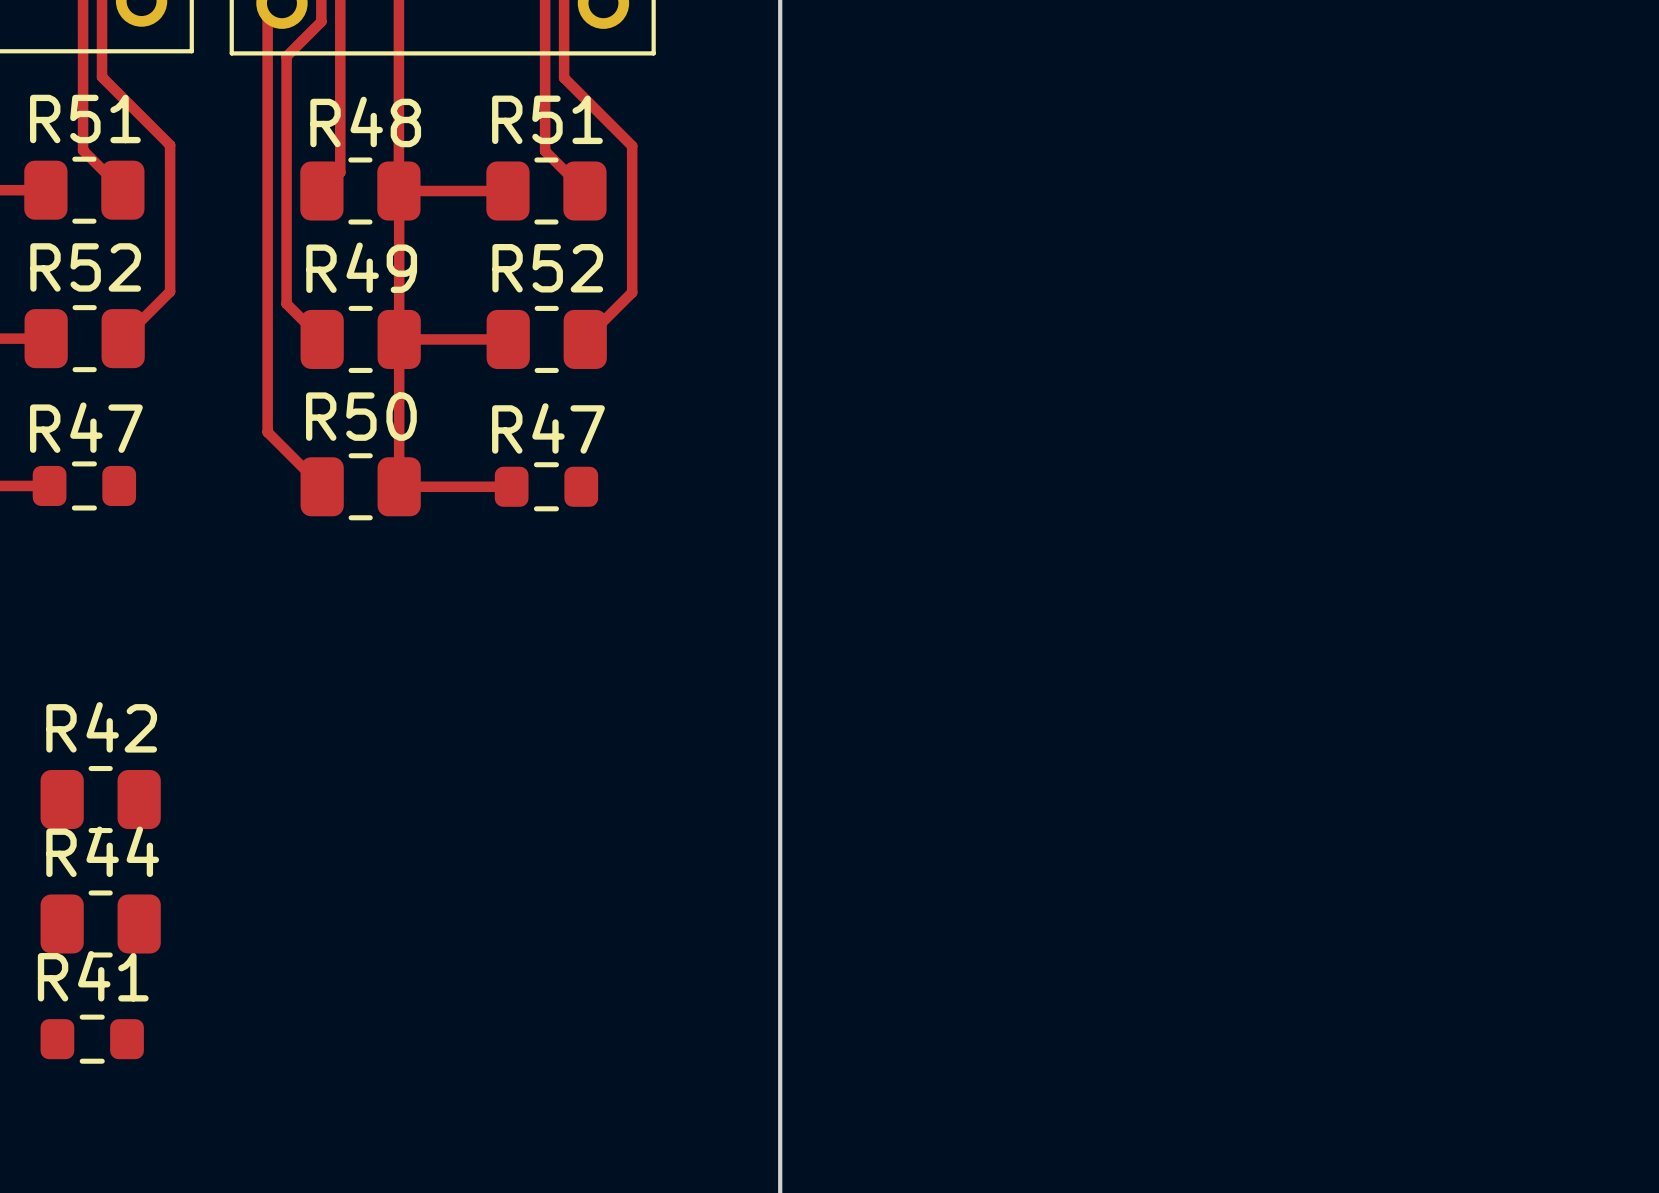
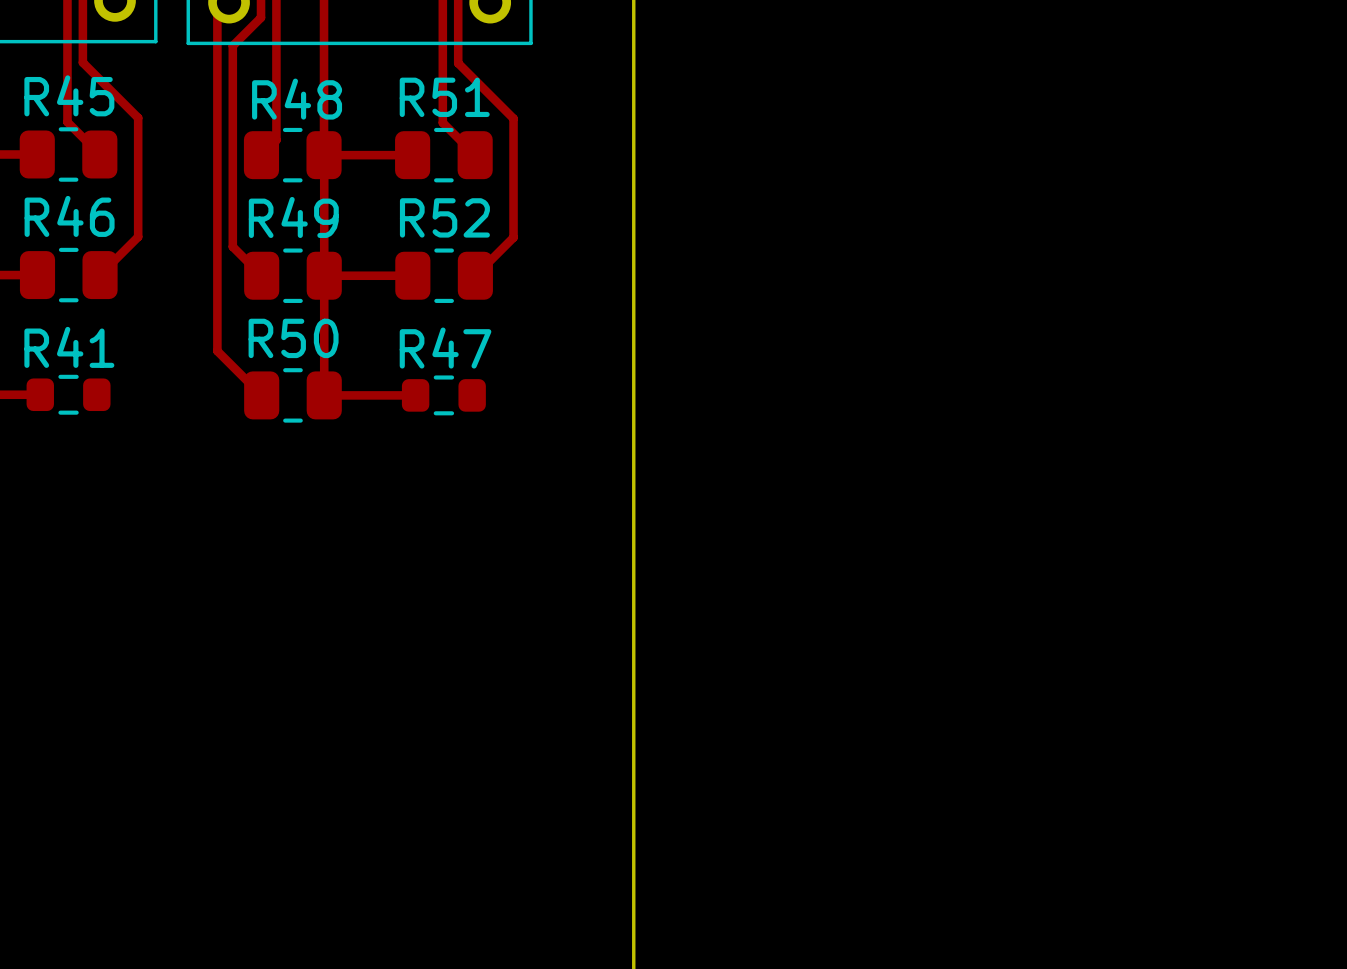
R51 name: R51 (85, 119) -> R45 (69, 95)
R52 name: R52 (85, 267) -> R46 (69, 216)
R47 name: R47 (86, 427) -> R41 (69, 347)
R42: (100, 799) -> none
R44: (100, 923) -> none
R41: (92, 1039) -> none

